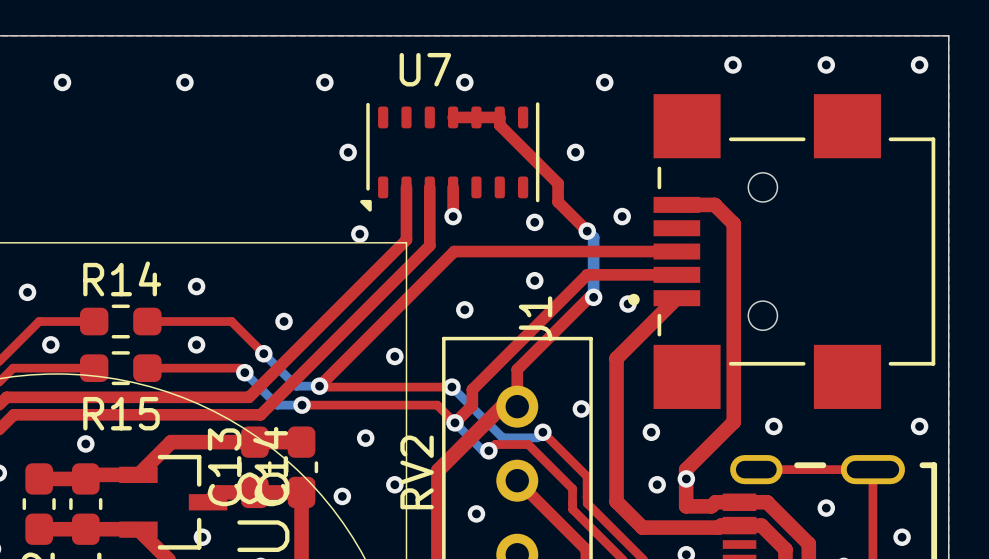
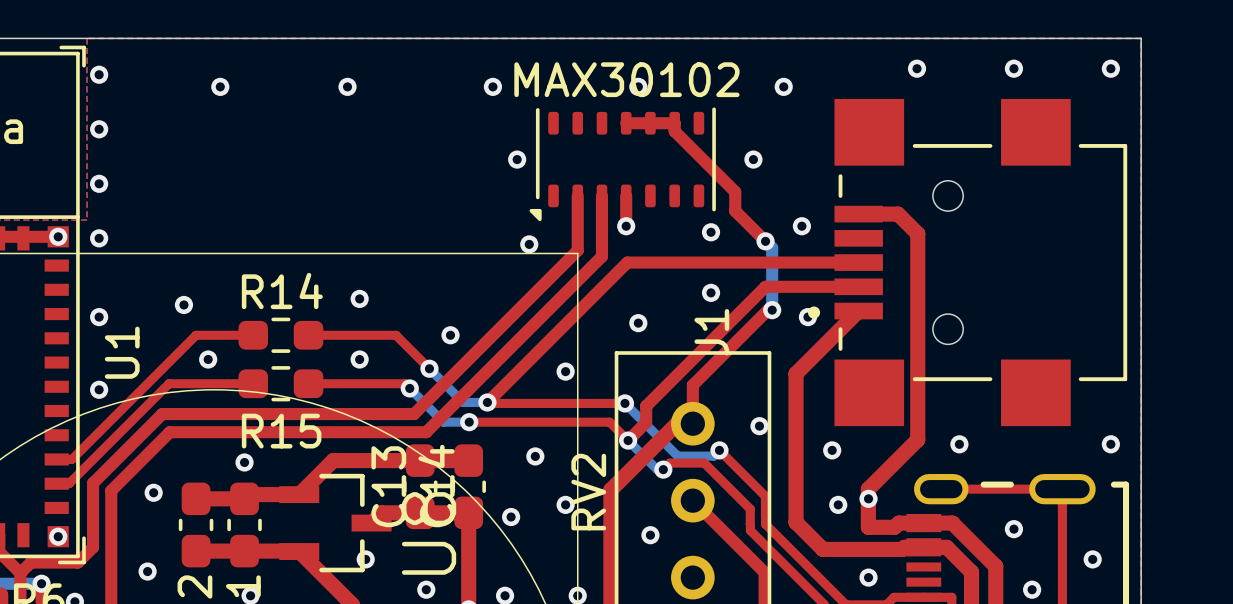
U7 name: U7 (425, 69) -> MAX30102 (626, 79)

